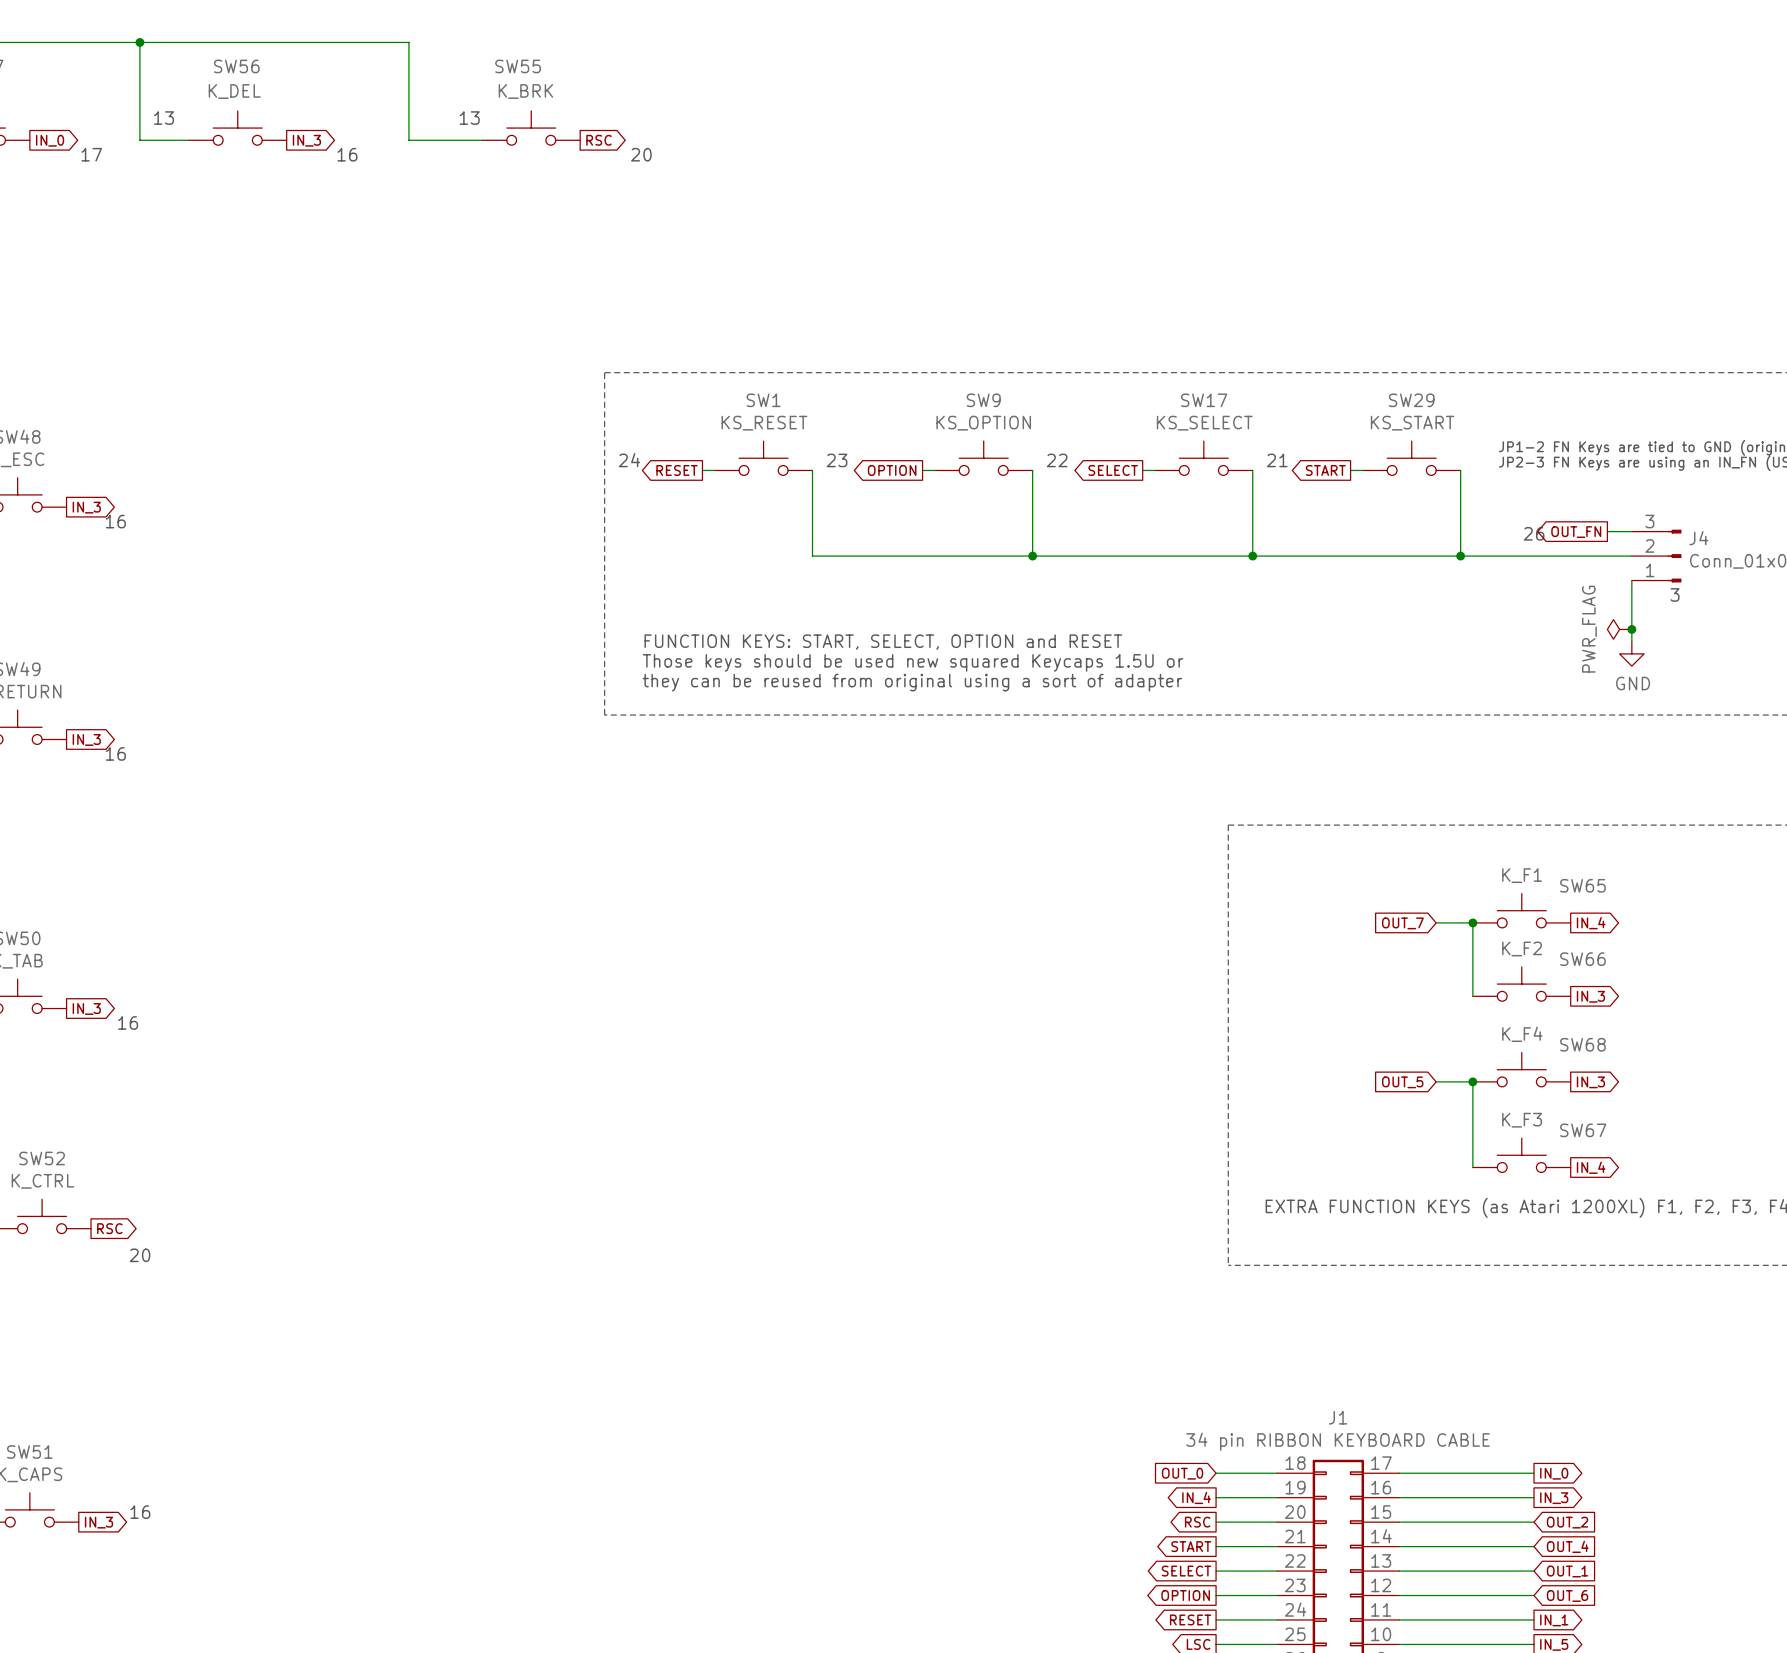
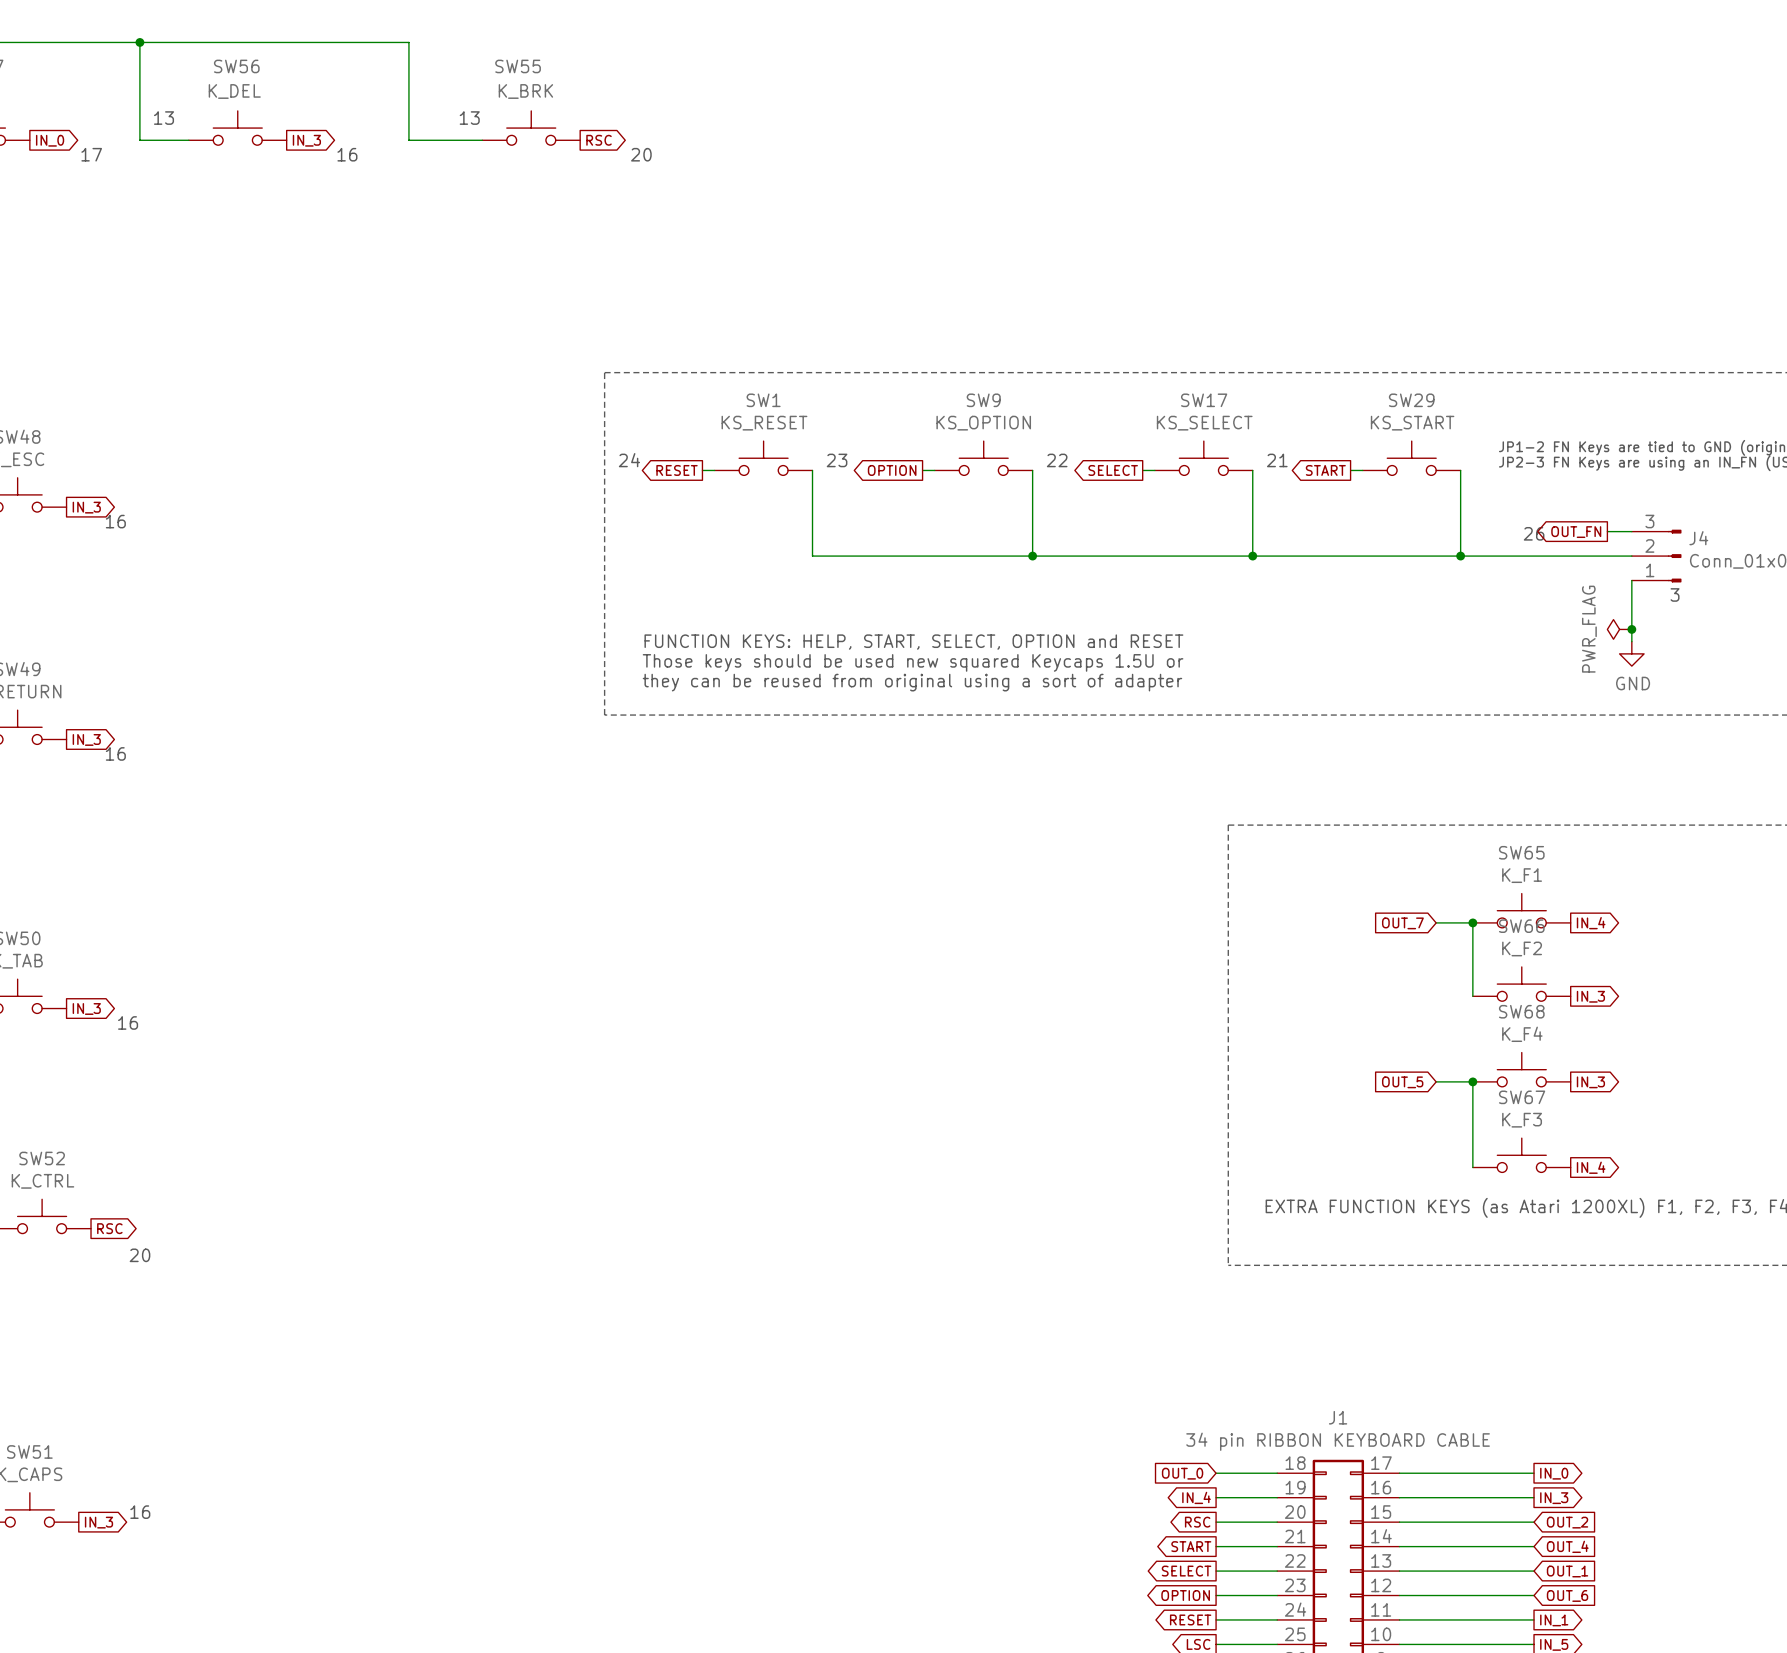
text: FUNCTION KEYS: START, SELECT, OPTION and RESET (883, 642) -> FUNCTION KEYS: HELP, START, SELECT, OPTION and RESET (913, 642)
SW65 name position: SW65 (1582, 885) -> SW65 (1521, 852)
SW66 name position: SW66 (1582, 959) -> SW66 (1521, 926)
SW68 name position: SW68 (1582, 1044) -> SW68 (1521, 1011)
SW67 name position: SW67 (1583, 1130) -> SW67 (1522, 1097)

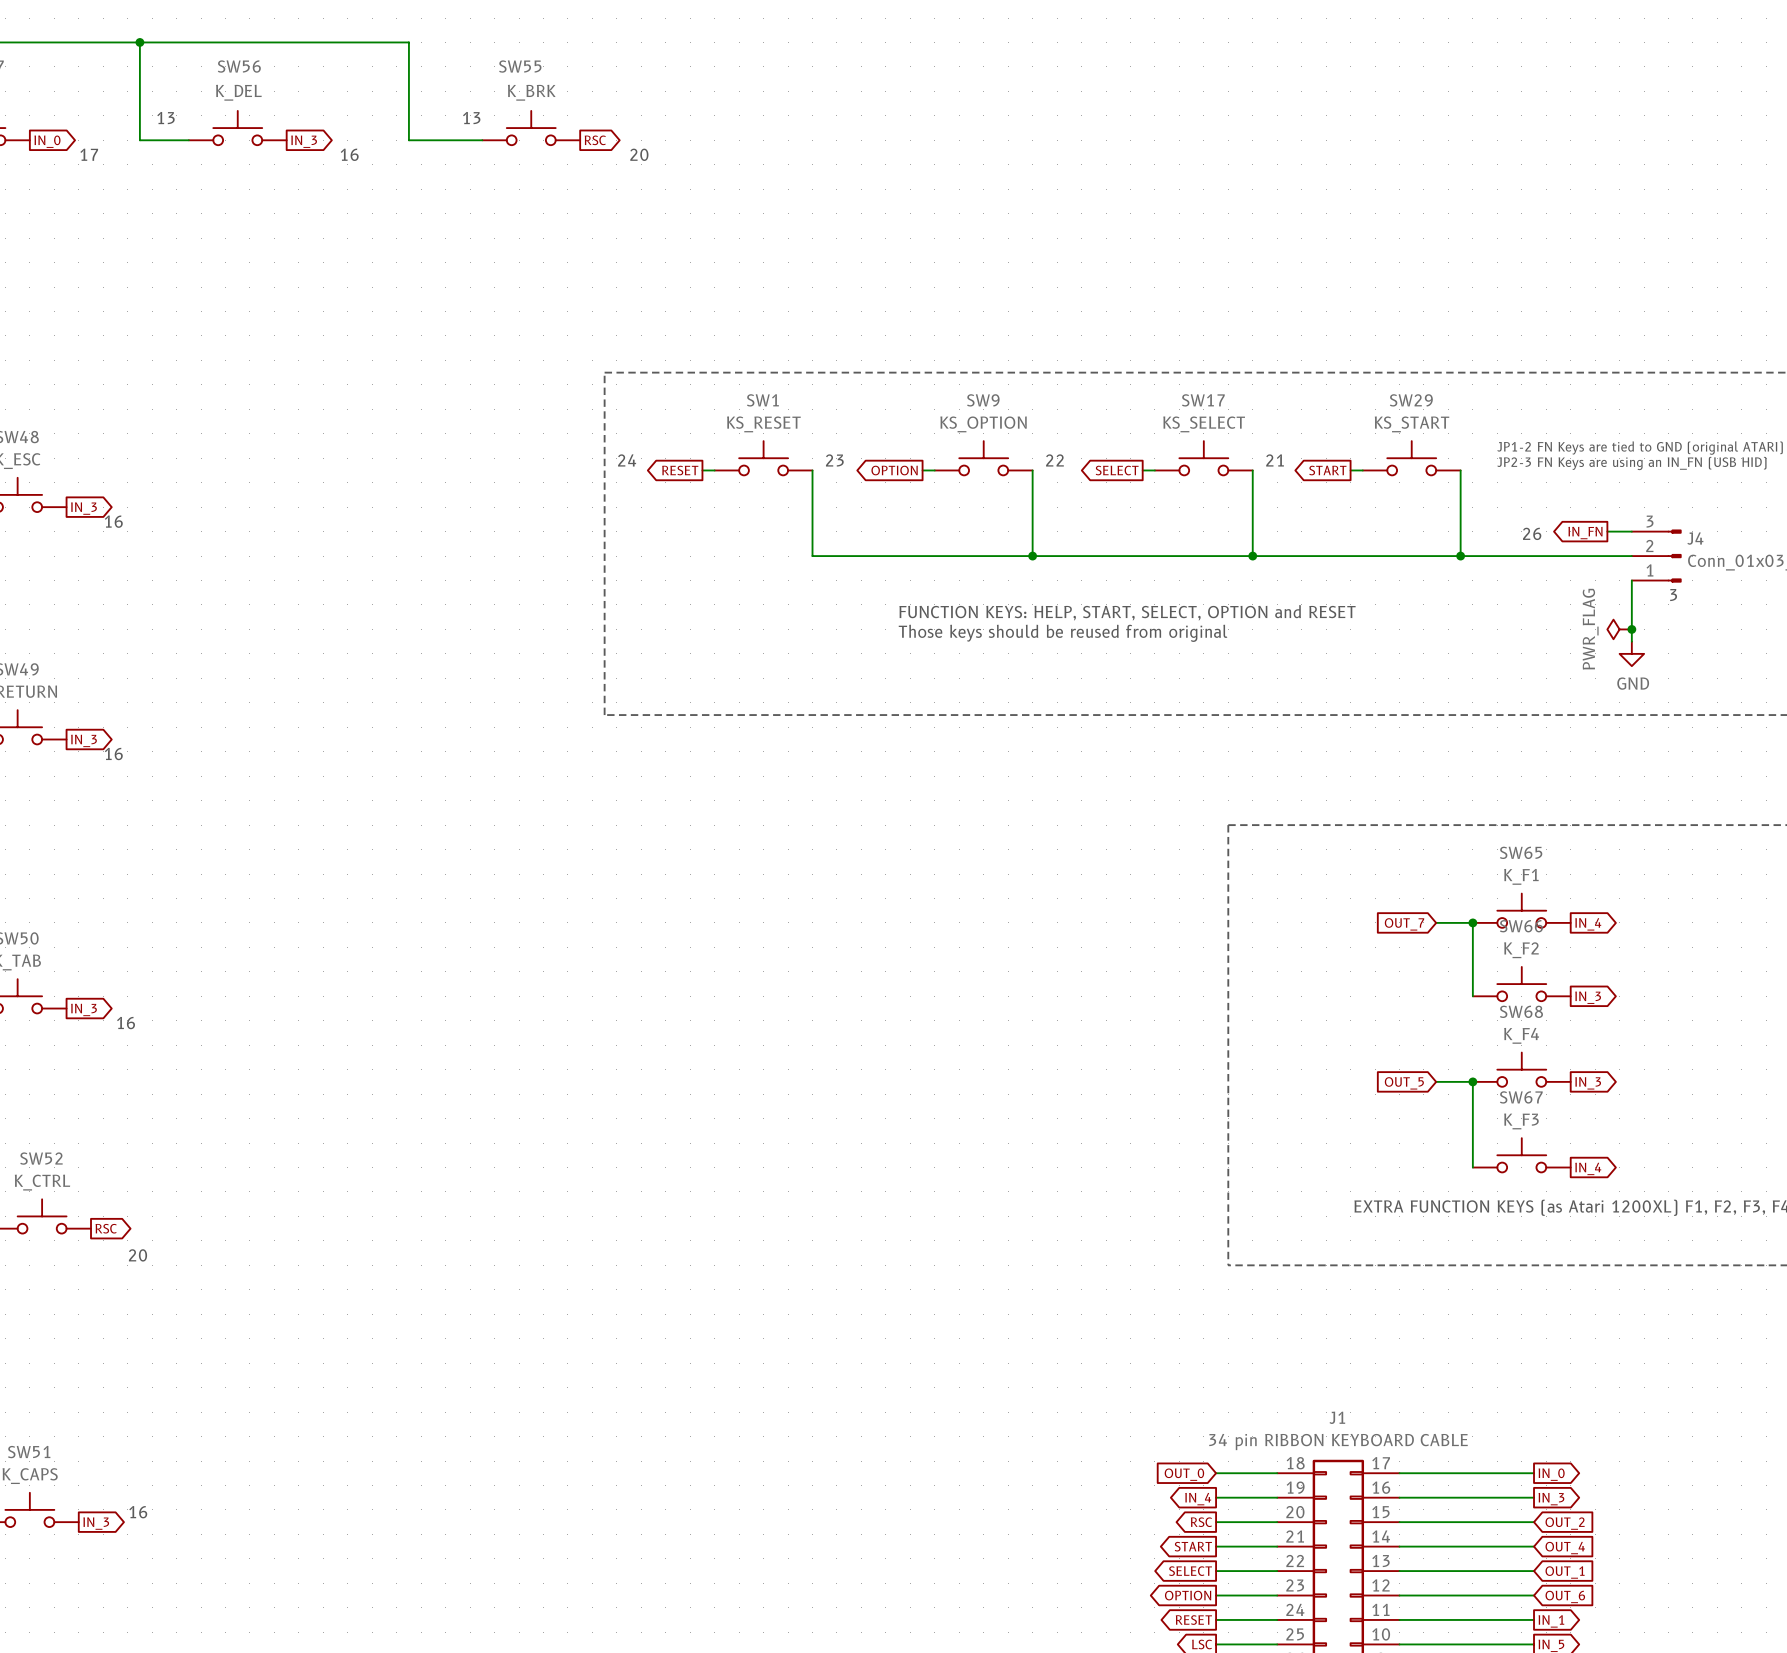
global label: OUT_FN (1576, 532) -> IN_FN (1585, 533)
text: none -> FUNCTION KEYS: HELP, START, SELECT, OPTION and RESET (1127, 612)
text: none -> Those keys should be reused from original (1063, 633)
text: FUNCTION KEYS: HELP, START, SELECT, OPTION and RESET (913, 642) -> none
text: Those keys should be used new squared Keycaps 1.5U or (913, 662) -> none
text: they can be reused from original using a sort of adapter (912, 682) -> none

